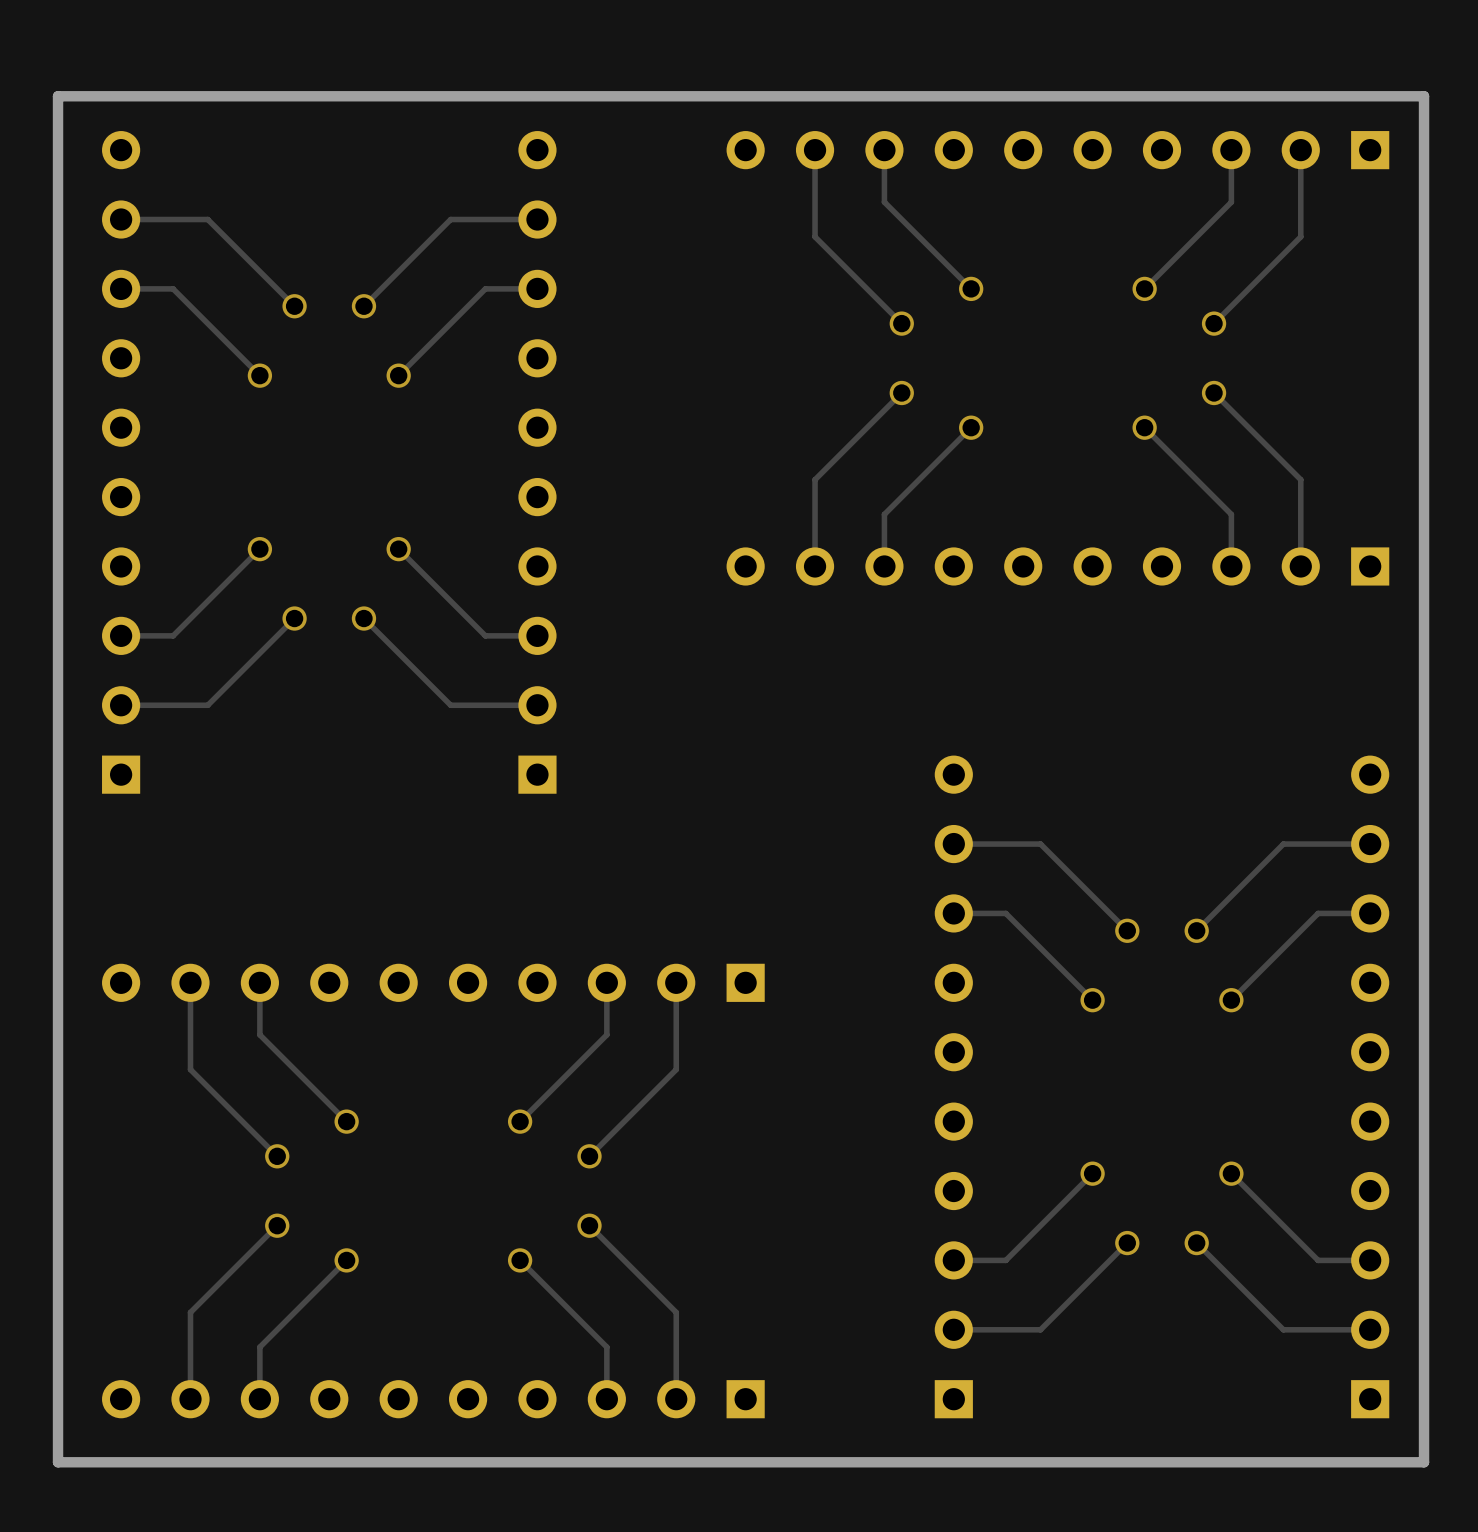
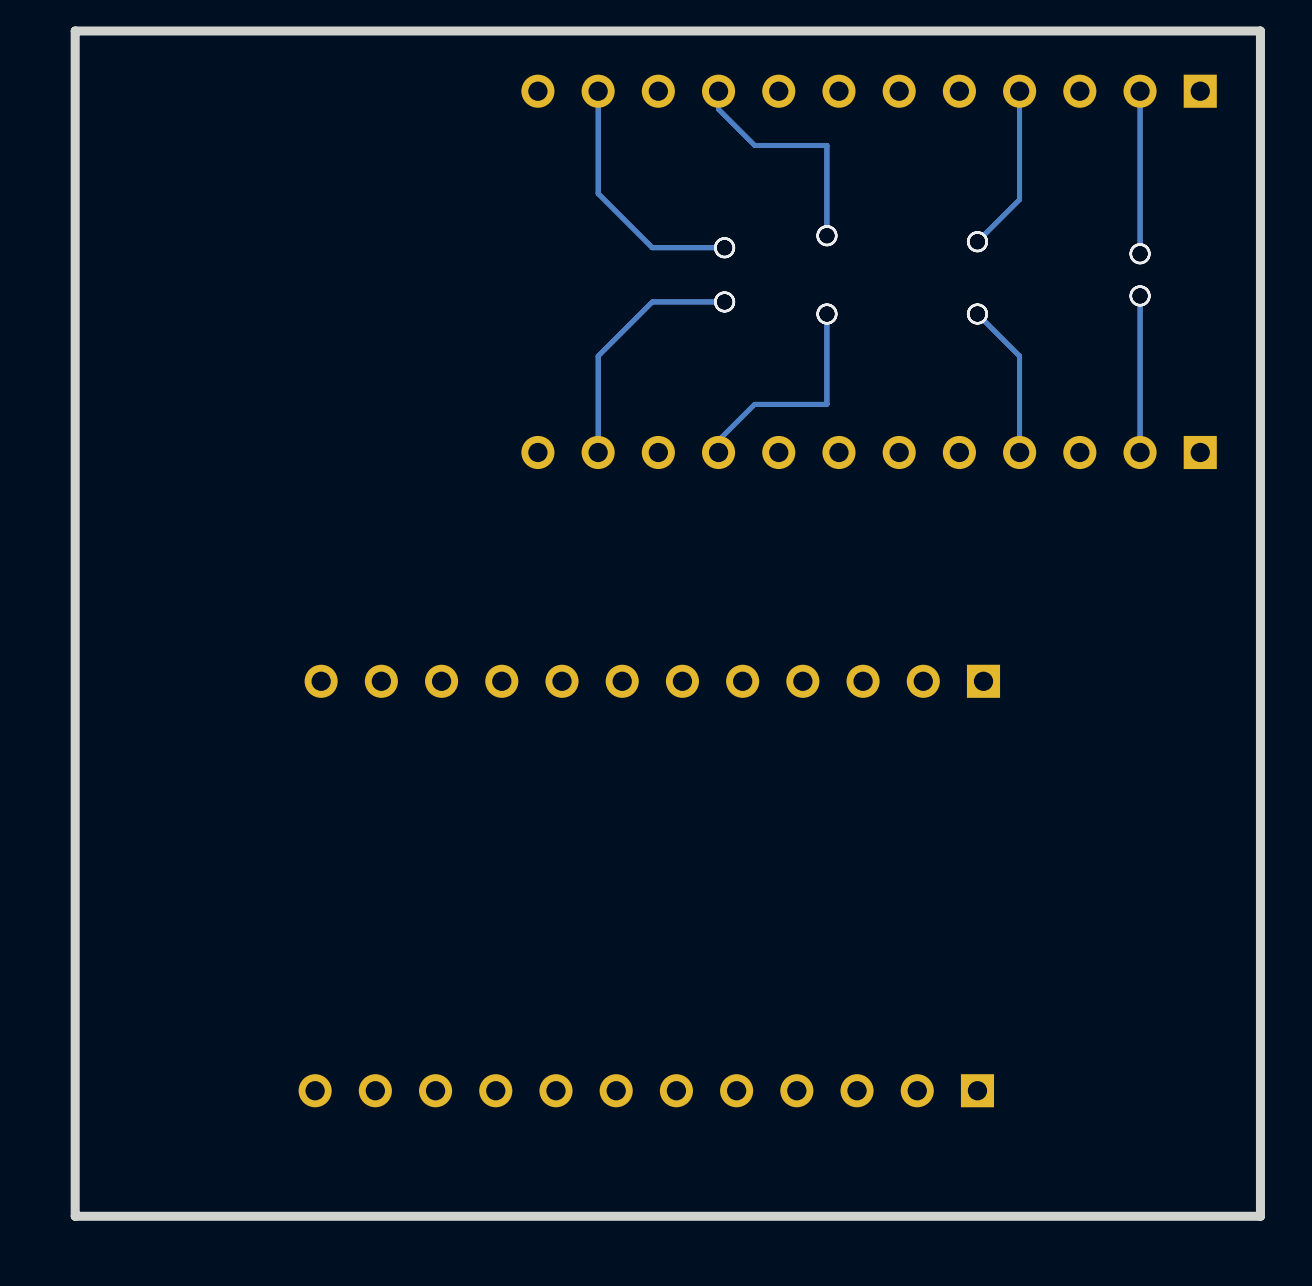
track: (815, 150) (815, 236) (901, 323) -> none
track: (884, 150) (884, 202) (971, 288) -> none
part: (1057, 150) -> none
track: (1231, 150) (1231, 202) (1144, 288) -> none
track: (1300, 150) (1300, 236) (1214, 323) -> none
track: none -> (598, 91) (598, 193) (652, 247) (724, 247)
track: none -> (718, 91) (718, 109) (754, 145) (826, 145) (826, 235)
part: none -> (869, 91)
track: none -> (1019, 91) (1019, 199) (977, 241)
track: none -> (1140, 91) (1140, 253)
track: (121, 219) (207, 219) (294, 306) -> none
track: (537, 219) (450, 219) (363, 306) -> none
track: (121, 288) (173, 288) (259, 375) -> none
track: (537, 288) (485, 288) (398, 375) -> none
via: (971, 288) -> none
via: (1144, 288) -> none
via: (294, 306) -> none
via: (363, 306) -> none
via position: (901, 323) -> (826, 235)
via: (1214, 323) -> none
via: none -> (977, 241)
via: none -> (724, 247)
via: none -> (1140, 253)
via: (259, 375) -> none
via: (398, 375) -> none
track: (901, 392) (815, 479) (815, 566) -> none
via: (901, 392) -> none
track: (1214, 392) (1300, 479) (1300, 566) -> none
via: (1214, 392) -> none
track: none -> (1140, 295) (1140, 452)
via: none -> (1140, 295)
track: none -> (724, 301) (652, 301) (598, 356) (598, 452)
via: none -> (724, 301)
track: none -> (826, 314) (826, 404) (754, 404) (718, 440) (718, 452)
via: none -> (826, 314)
track: none -> (977, 314) (1019, 356) (1019, 452)
track: (971, 427) (884, 514) (884, 566) -> none
via: (971, 427) -> none
track: (1144, 427) (1231, 514) (1231, 566) -> none
via position: (1144, 427) -> (977, 314)
part: (121, 462) -> none
part: (537, 462) -> none
track: (259, 549) (173, 635) (121, 635) -> none
via: (259, 549) -> none
track: (398, 549) (485, 635) (537, 635) -> none
via: (398, 549) -> none
part: (1057, 566) -> none
part: none -> (869, 452)
track: (294, 618) (207, 705) (121, 705) -> none
via: (294, 618) -> none
track: (363, 618) (450, 705) (537, 705) -> none
via: (363, 618) -> none
track: (953, 844) (1040, 844) (1127, 930) -> none
track: (1370, 844) (1283, 844) (1196, 930) -> none
part: none -> (652, 681)
track: (953, 913) (1005, 913) (1092, 1000) -> none
track: (1370, 913) (1318, 913) (1231, 1000) -> none
via: (1127, 930) -> none
via: (1196, 930) -> none
track: (190, 982) (190, 1069) (277, 1156) -> none
track: (259, 982) (259, 1034) (346, 1121) -> none
part: (433, 982) -> none
track: (606, 982) (606, 1034) (520, 1121) -> none
track: (676, 982) (676, 1069) (589, 1156) -> none
via: (1092, 1000) -> none
via: (1231, 1000) -> none
part: (953, 1086) -> none
part: (1370, 1086) -> none
via: (346, 1121) -> none
via: (520, 1121) -> none
via: (277, 1156) -> none
via: (589, 1156) -> none
track: (1092, 1173) (1005, 1260) (953, 1260) -> none
via: (1092, 1173) -> none
track: (1231, 1173) (1318, 1260) (1370, 1260) -> none
via: (1231, 1173) -> none
track: (277, 1225) (190, 1312) (190, 1399) -> none
via: (277, 1225) -> none
track: (589, 1225) (676, 1312) (676, 1399) -> none
via: (589, 1225) -> none
track: (1127, 1243) (1040, 1329) (953, 1329) -> none
via: (1127, 1243) -> none
track: (1196, 1243) (1283, 1329) (1370, 1329) -> none
via: (1196, 1243) -> none
track: (346, 1260) (259, 1347) (259, 1399) -> none
via: (346, 1260) -> none
track: (520, 1260) (606, 1347) (606, 1399) -> none
via: (520, 1260) -> none
part: none -> (646, 1090)
part: (433, 1399) -> none

